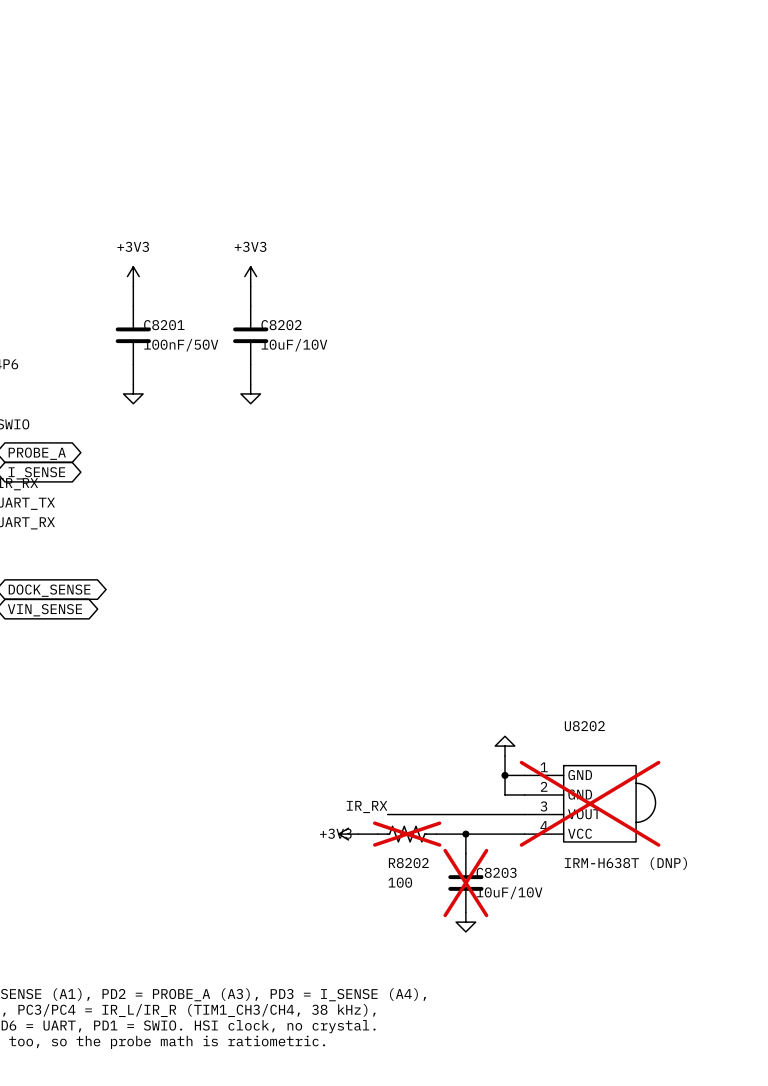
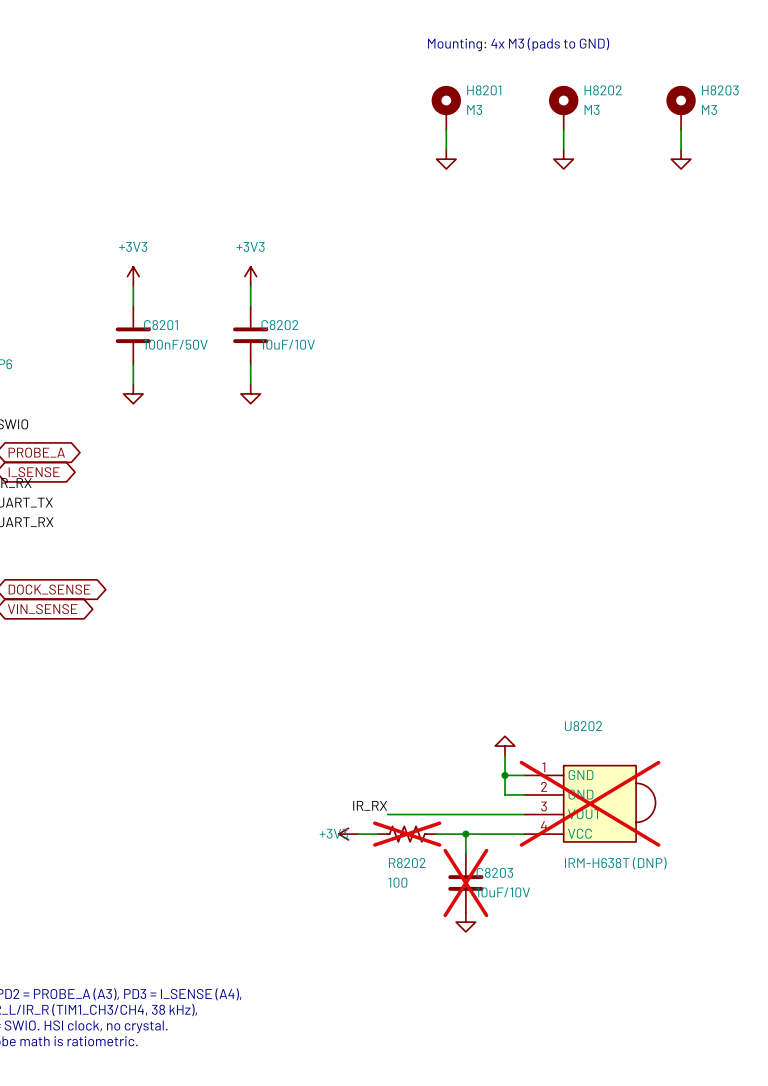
text: none -> Mounting: 4x M3 (pads to GND) (518, 44)
H8201: none -> M3 (446, 107)
H8202: none -> M3 (563, 107)
H8203: none -> M3 (681, 107)
wire: none -> (446, 129) (446, 149)
wire: none -> (563, 129) (563, 149)
wire: none -> (681, 129) (681, 149)
power symbol: none -> (446, 159)
power symbol: none -> (563, 159)
power symbol: none -> (681, 159)

